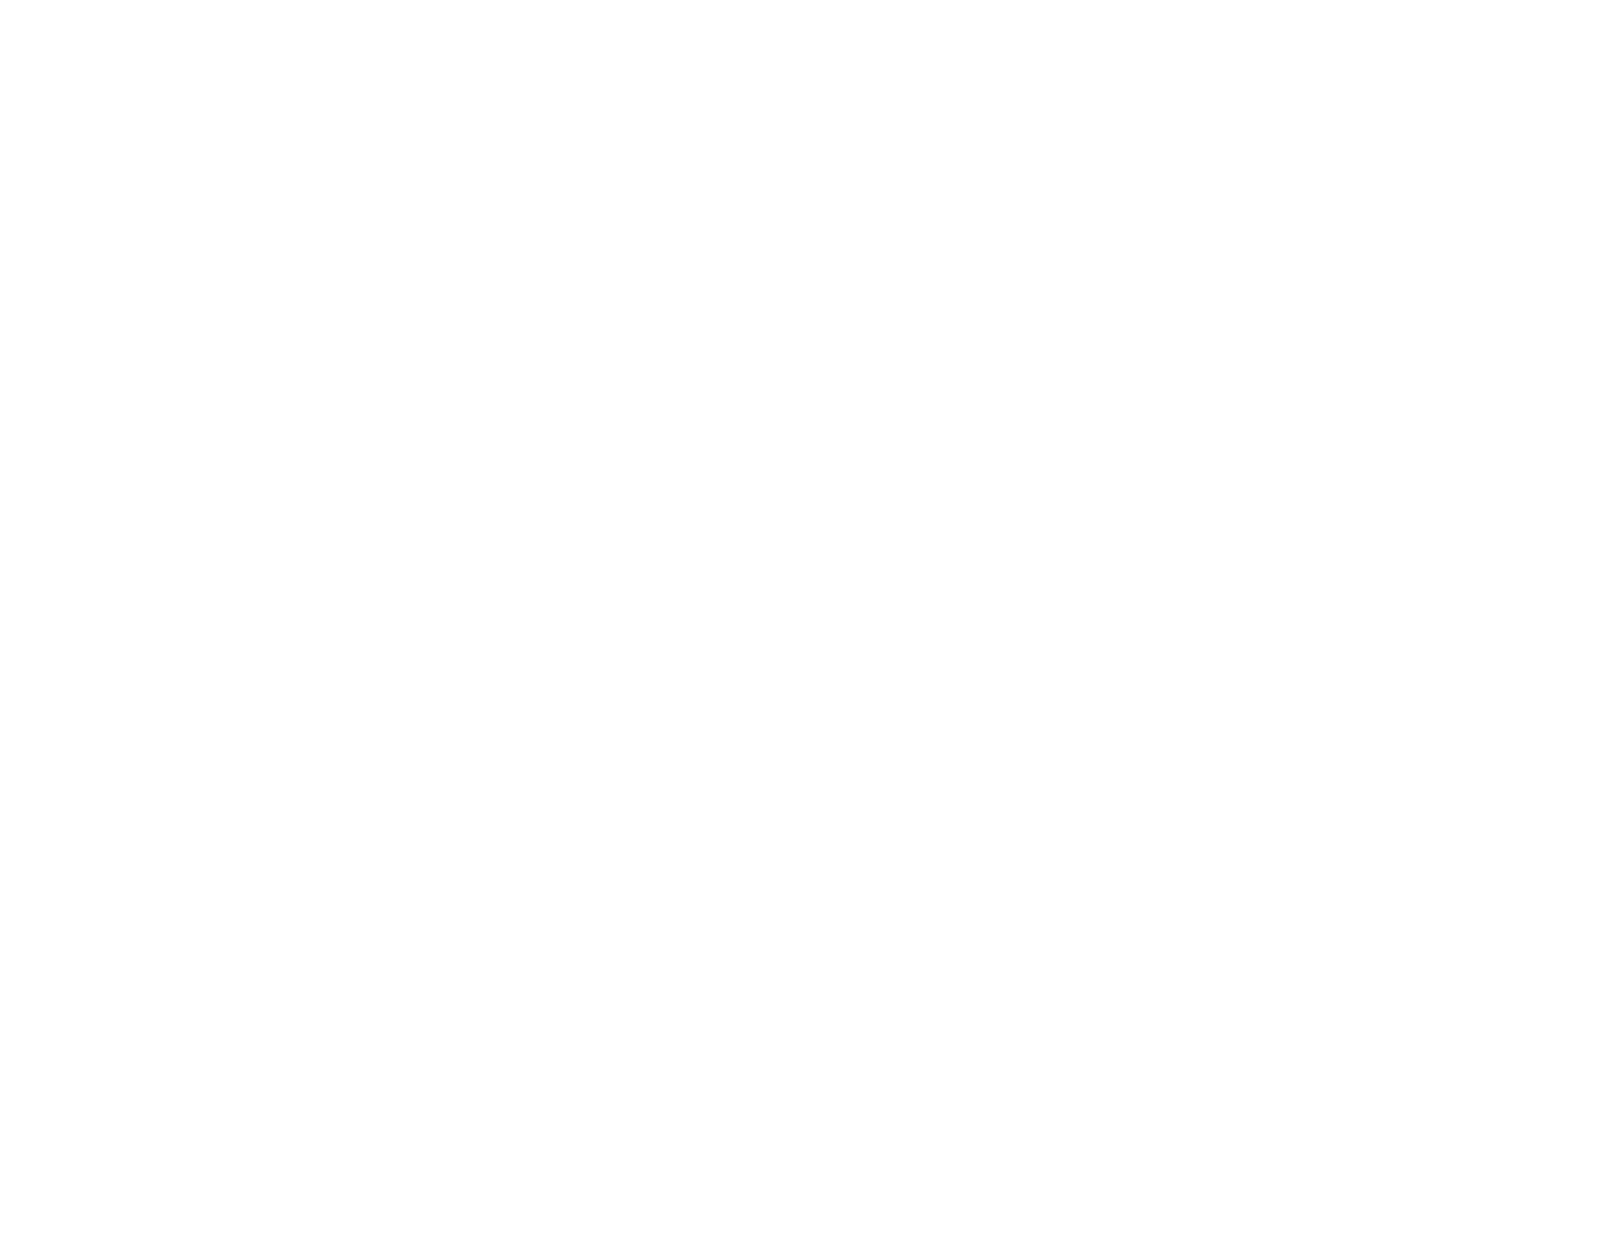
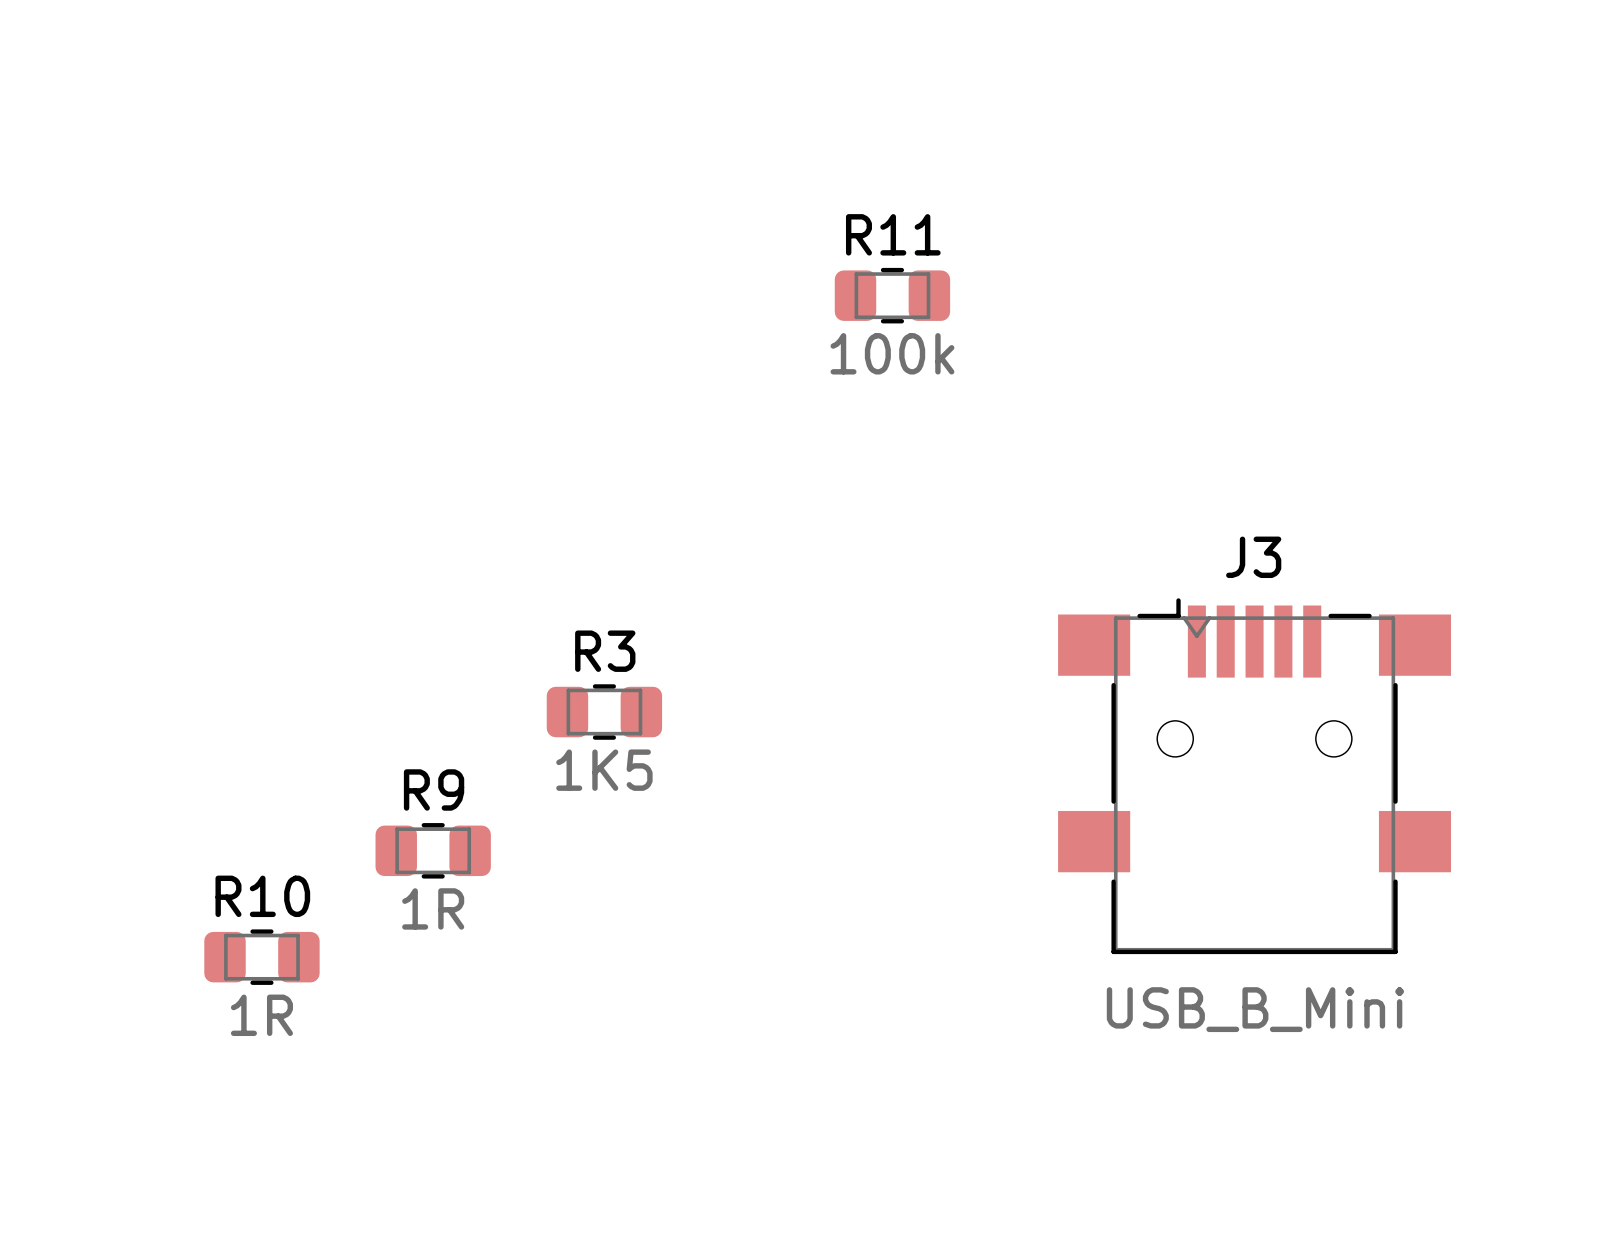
R11: none -> 100k (892, 295)
R3: none -> 1K5 (604, 712)
J3: none -> USB_B_Mini (1254, 776)
R9: none -> 1R (433, 850)
R10: none -> 1R (261, 957)

